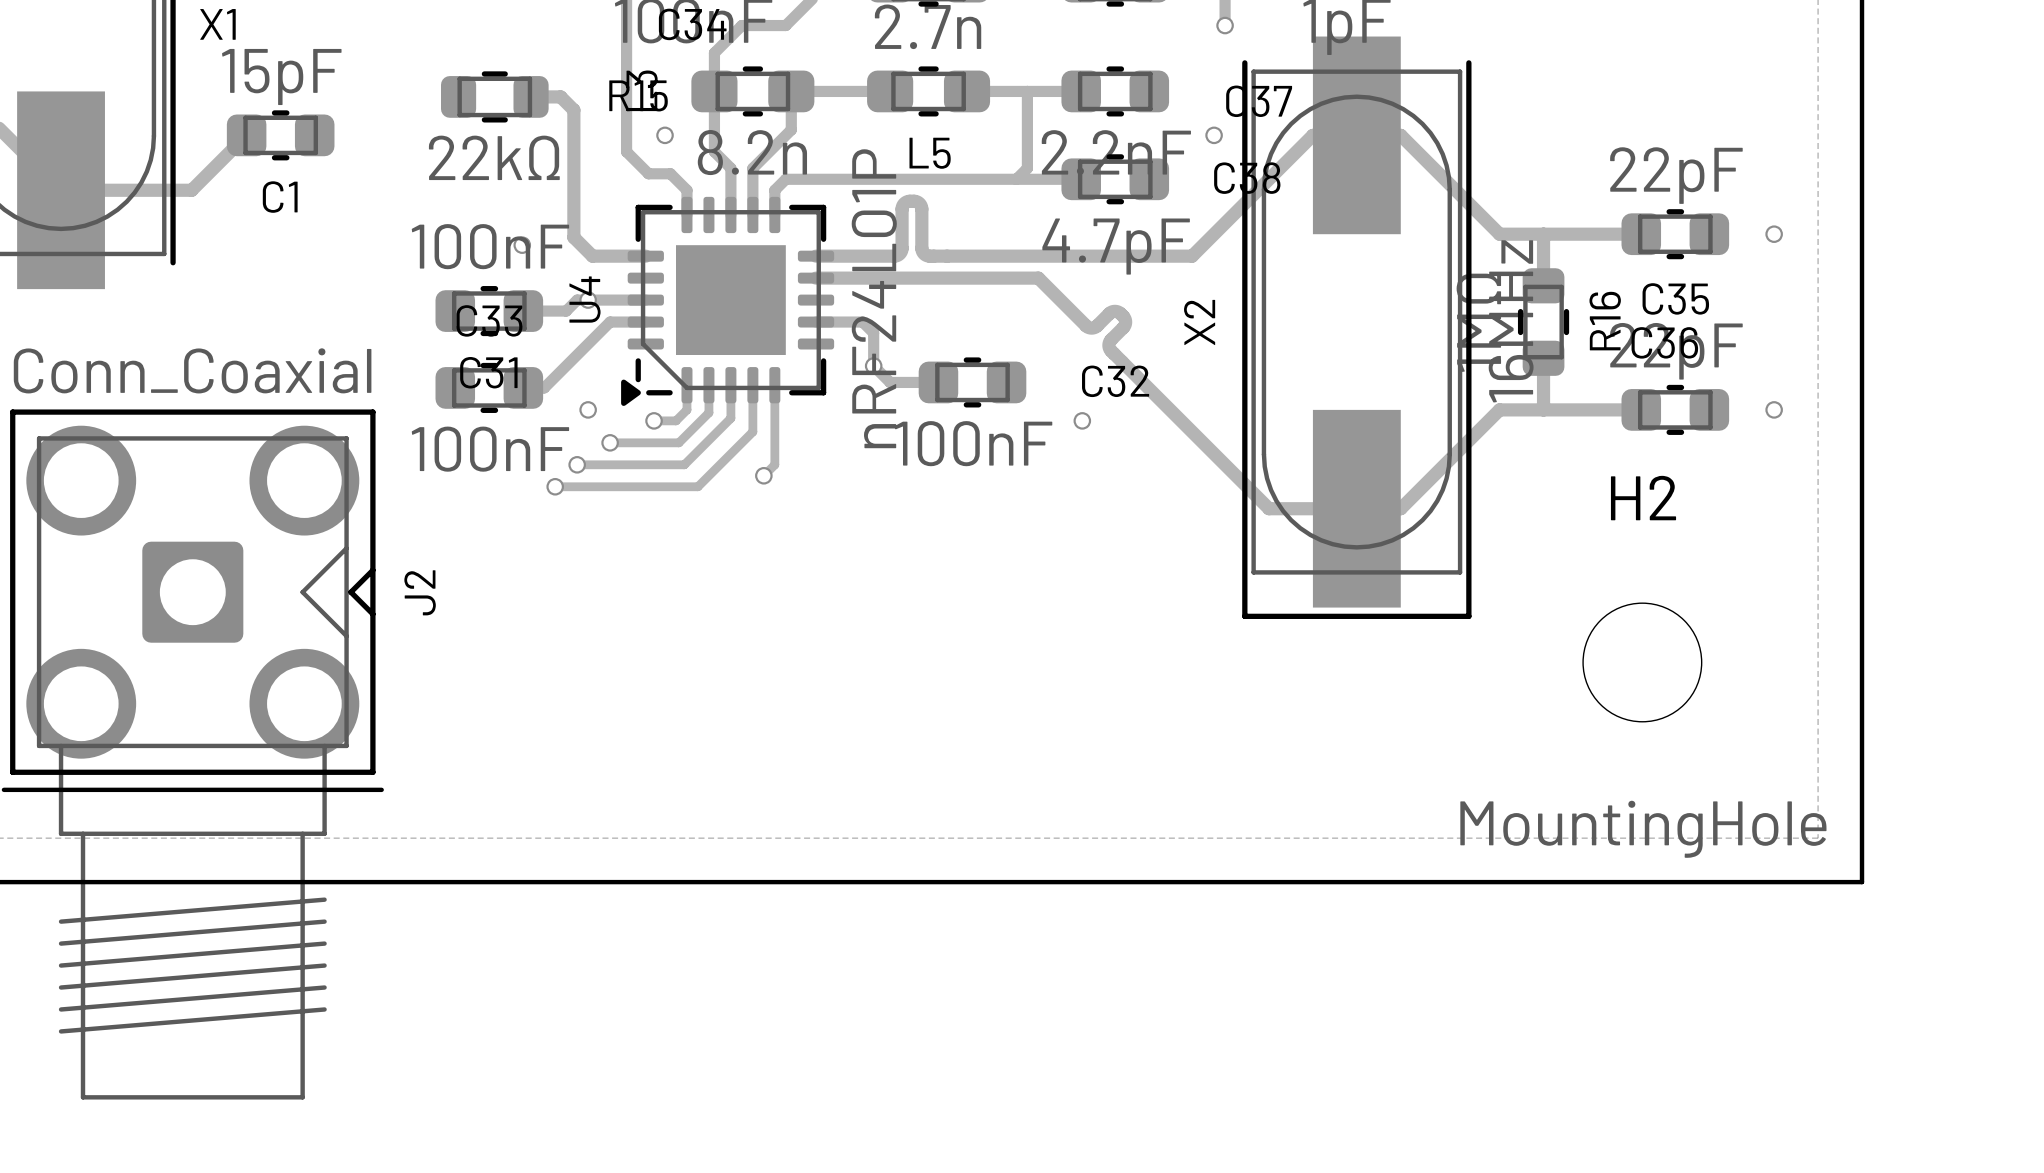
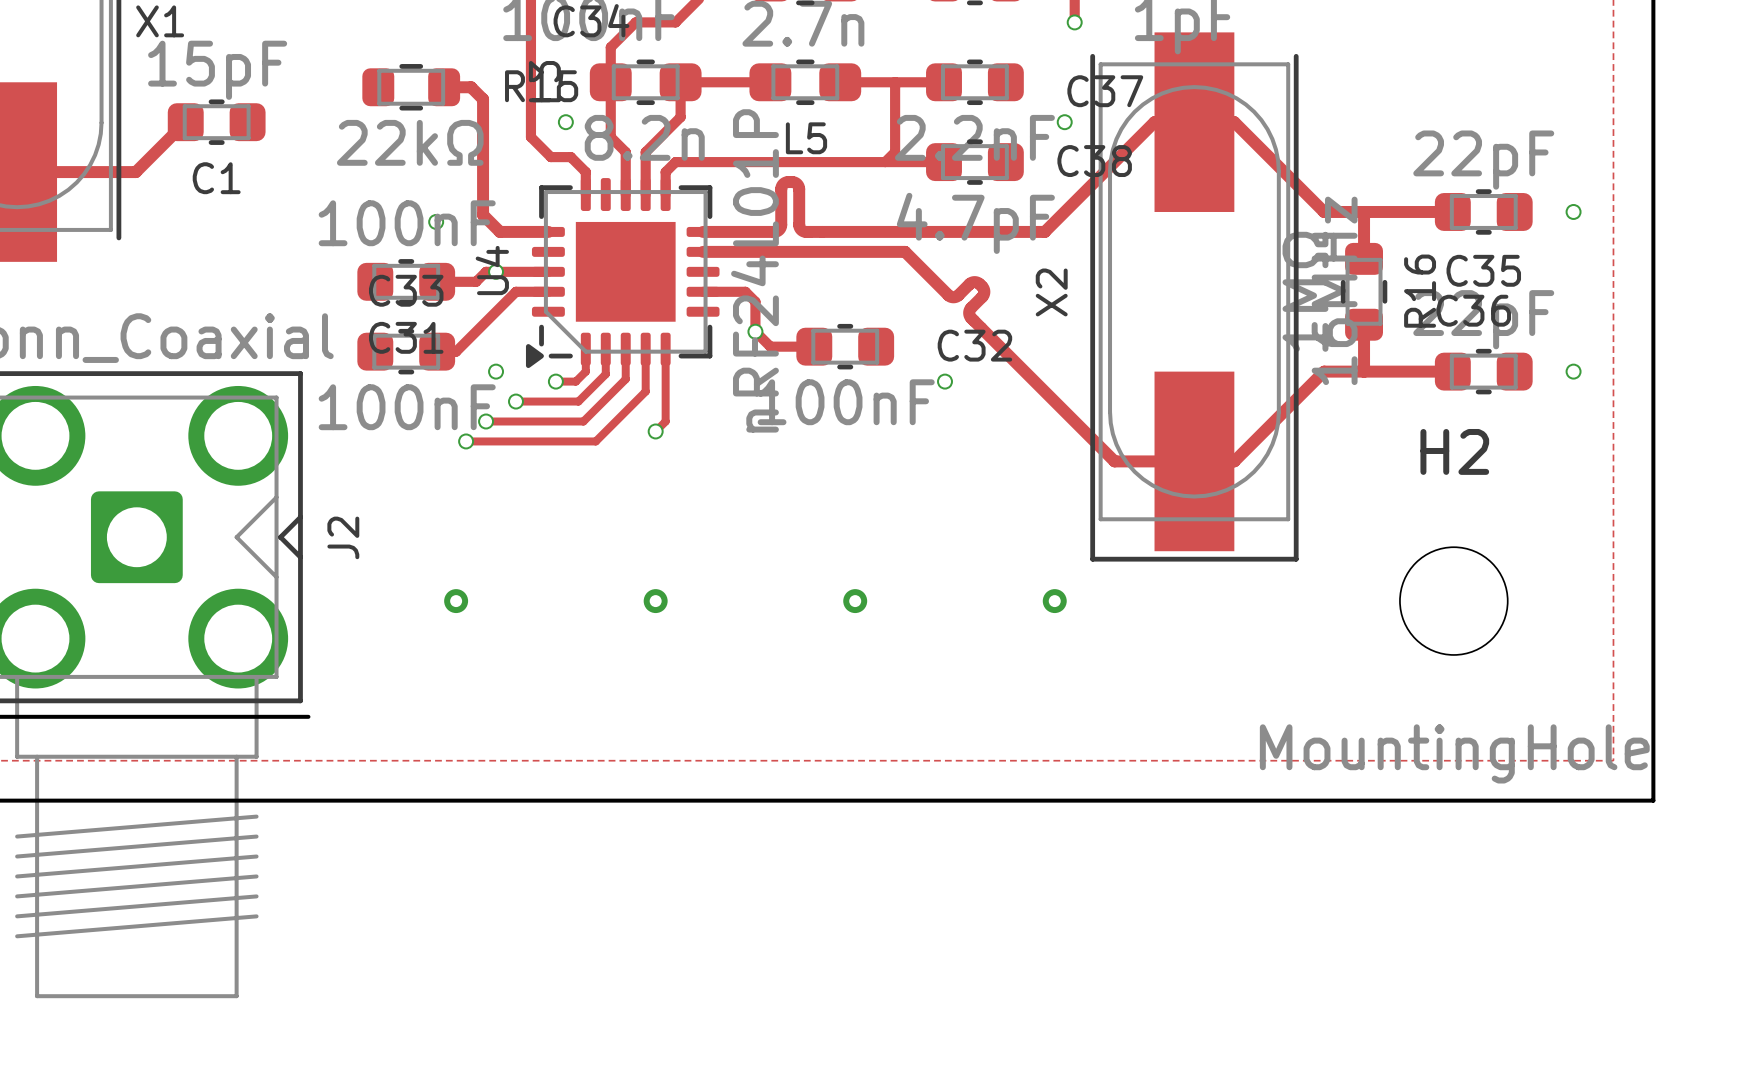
via: none -> (456, 601)
via: none -> (655, 601)
via: none -> (855, 601)
via: none -> (1054, 601)

